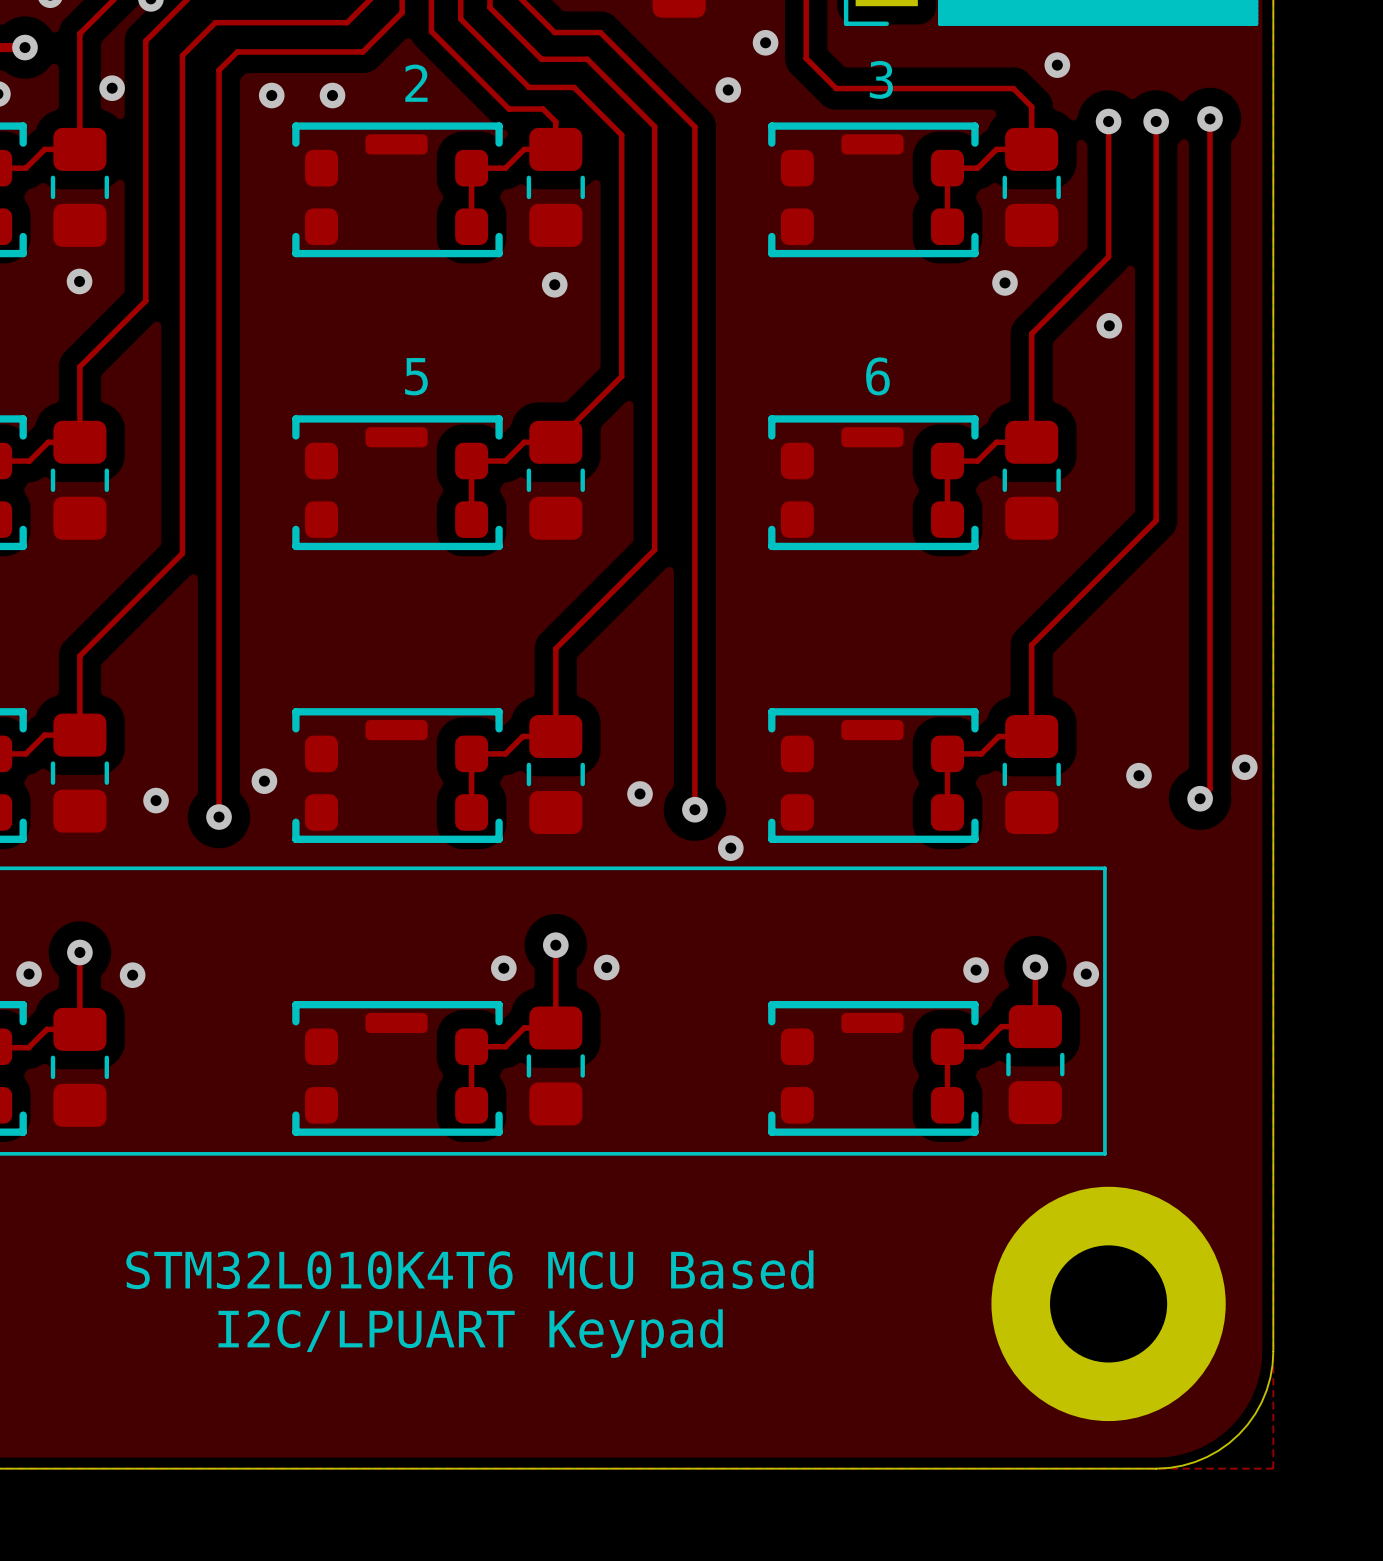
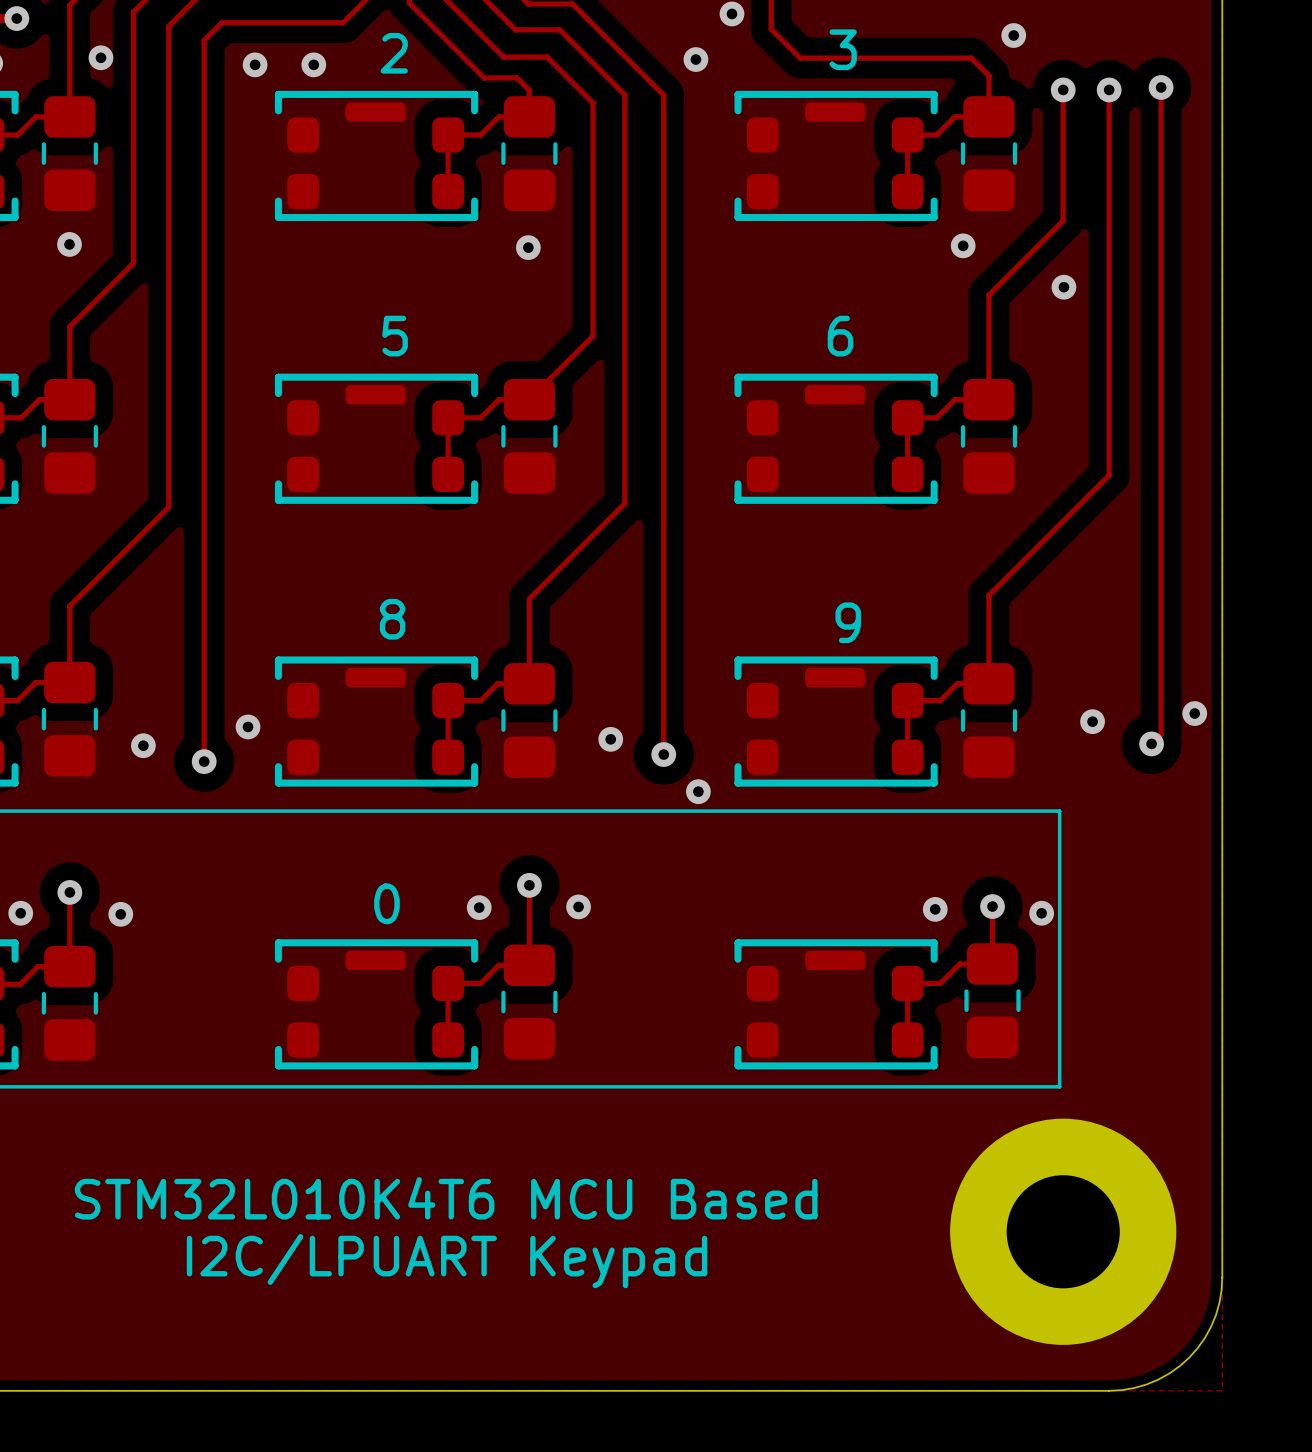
text: none -> 8 (392, 619)
text: none -> 9 (848, 622)
text: none -> 0 (386, 903)

